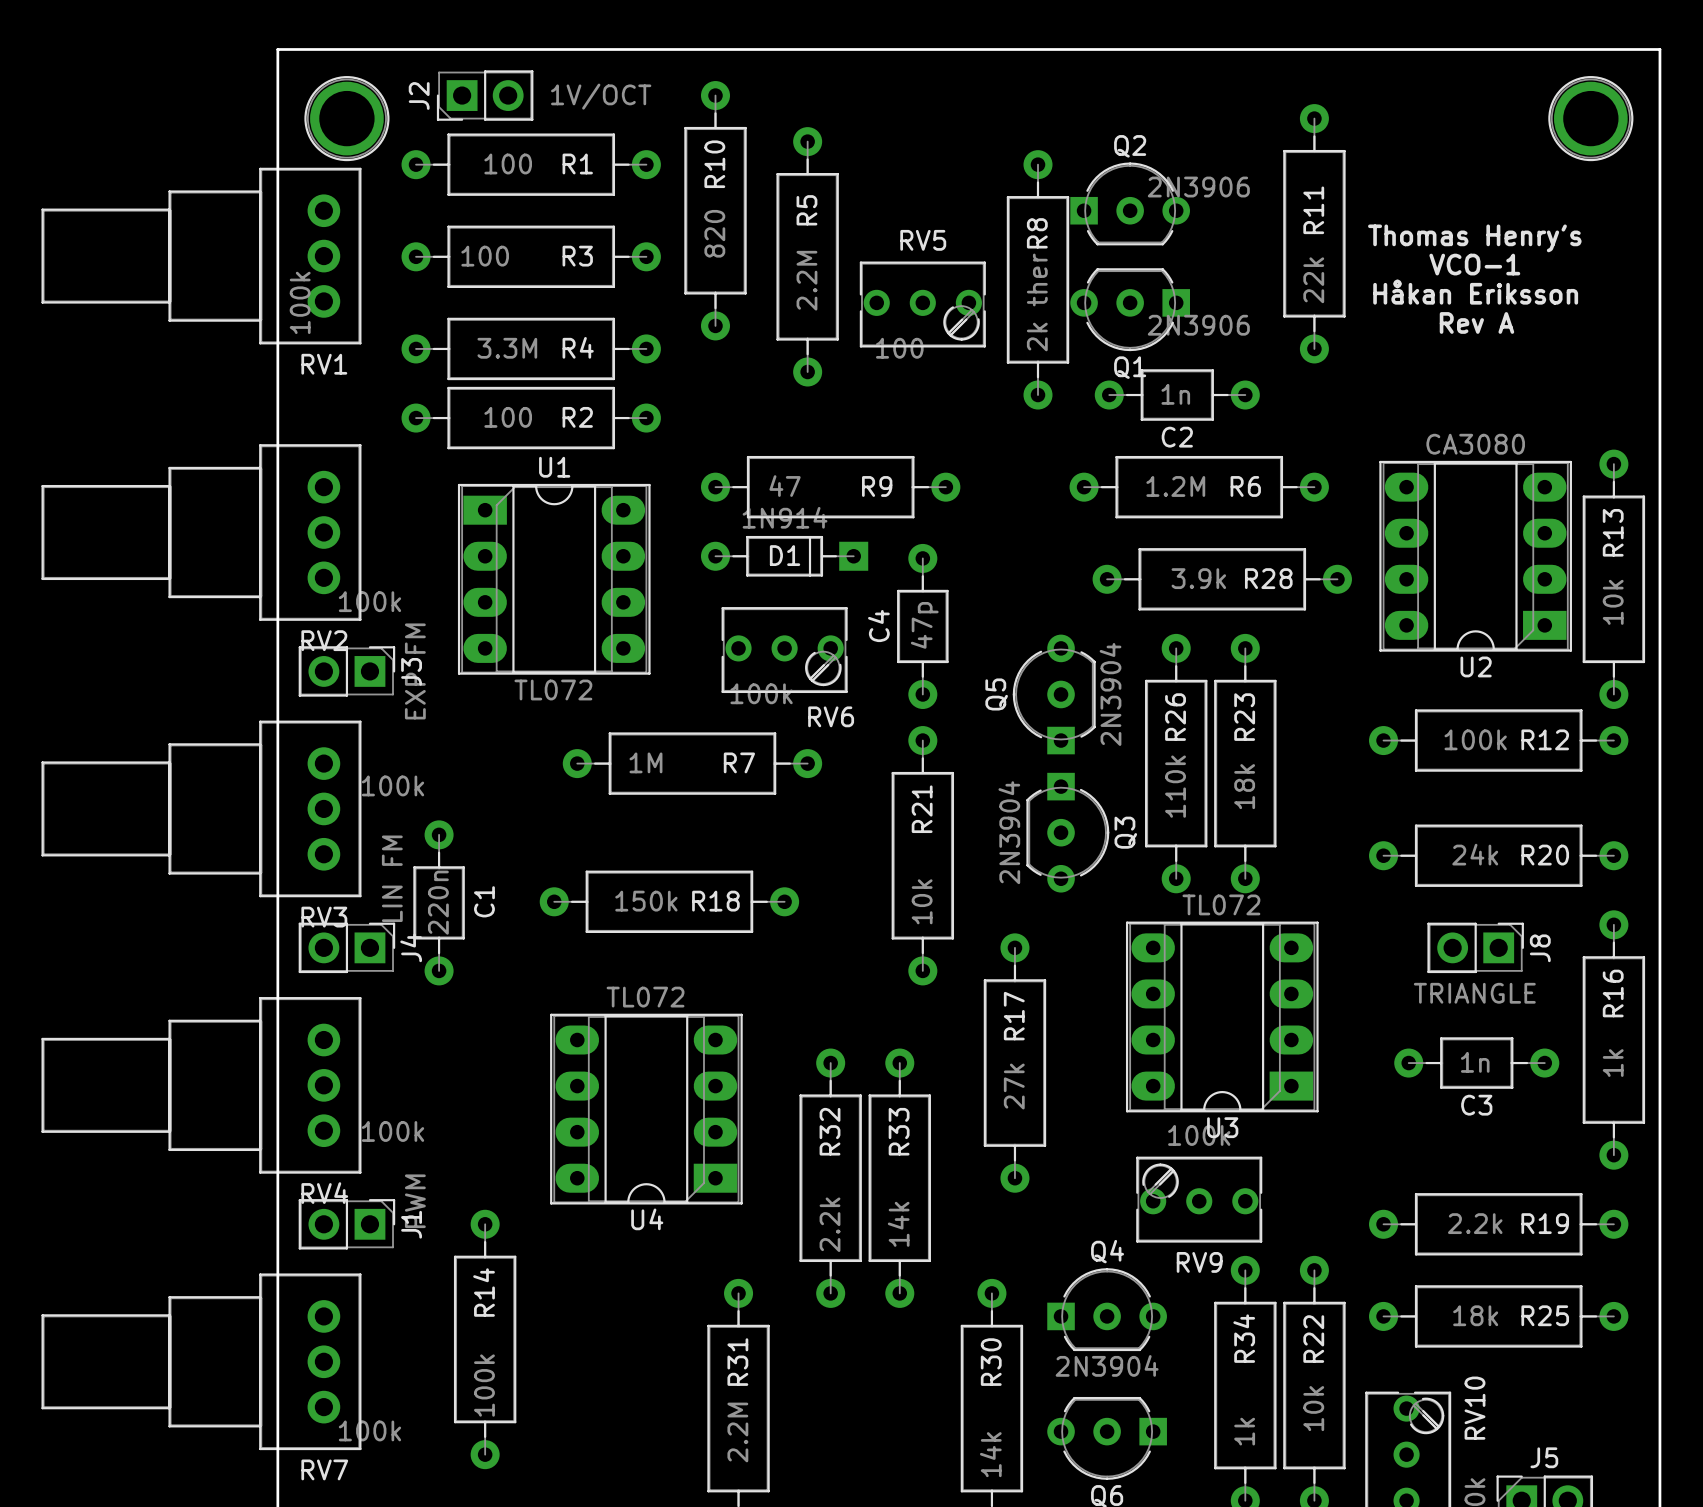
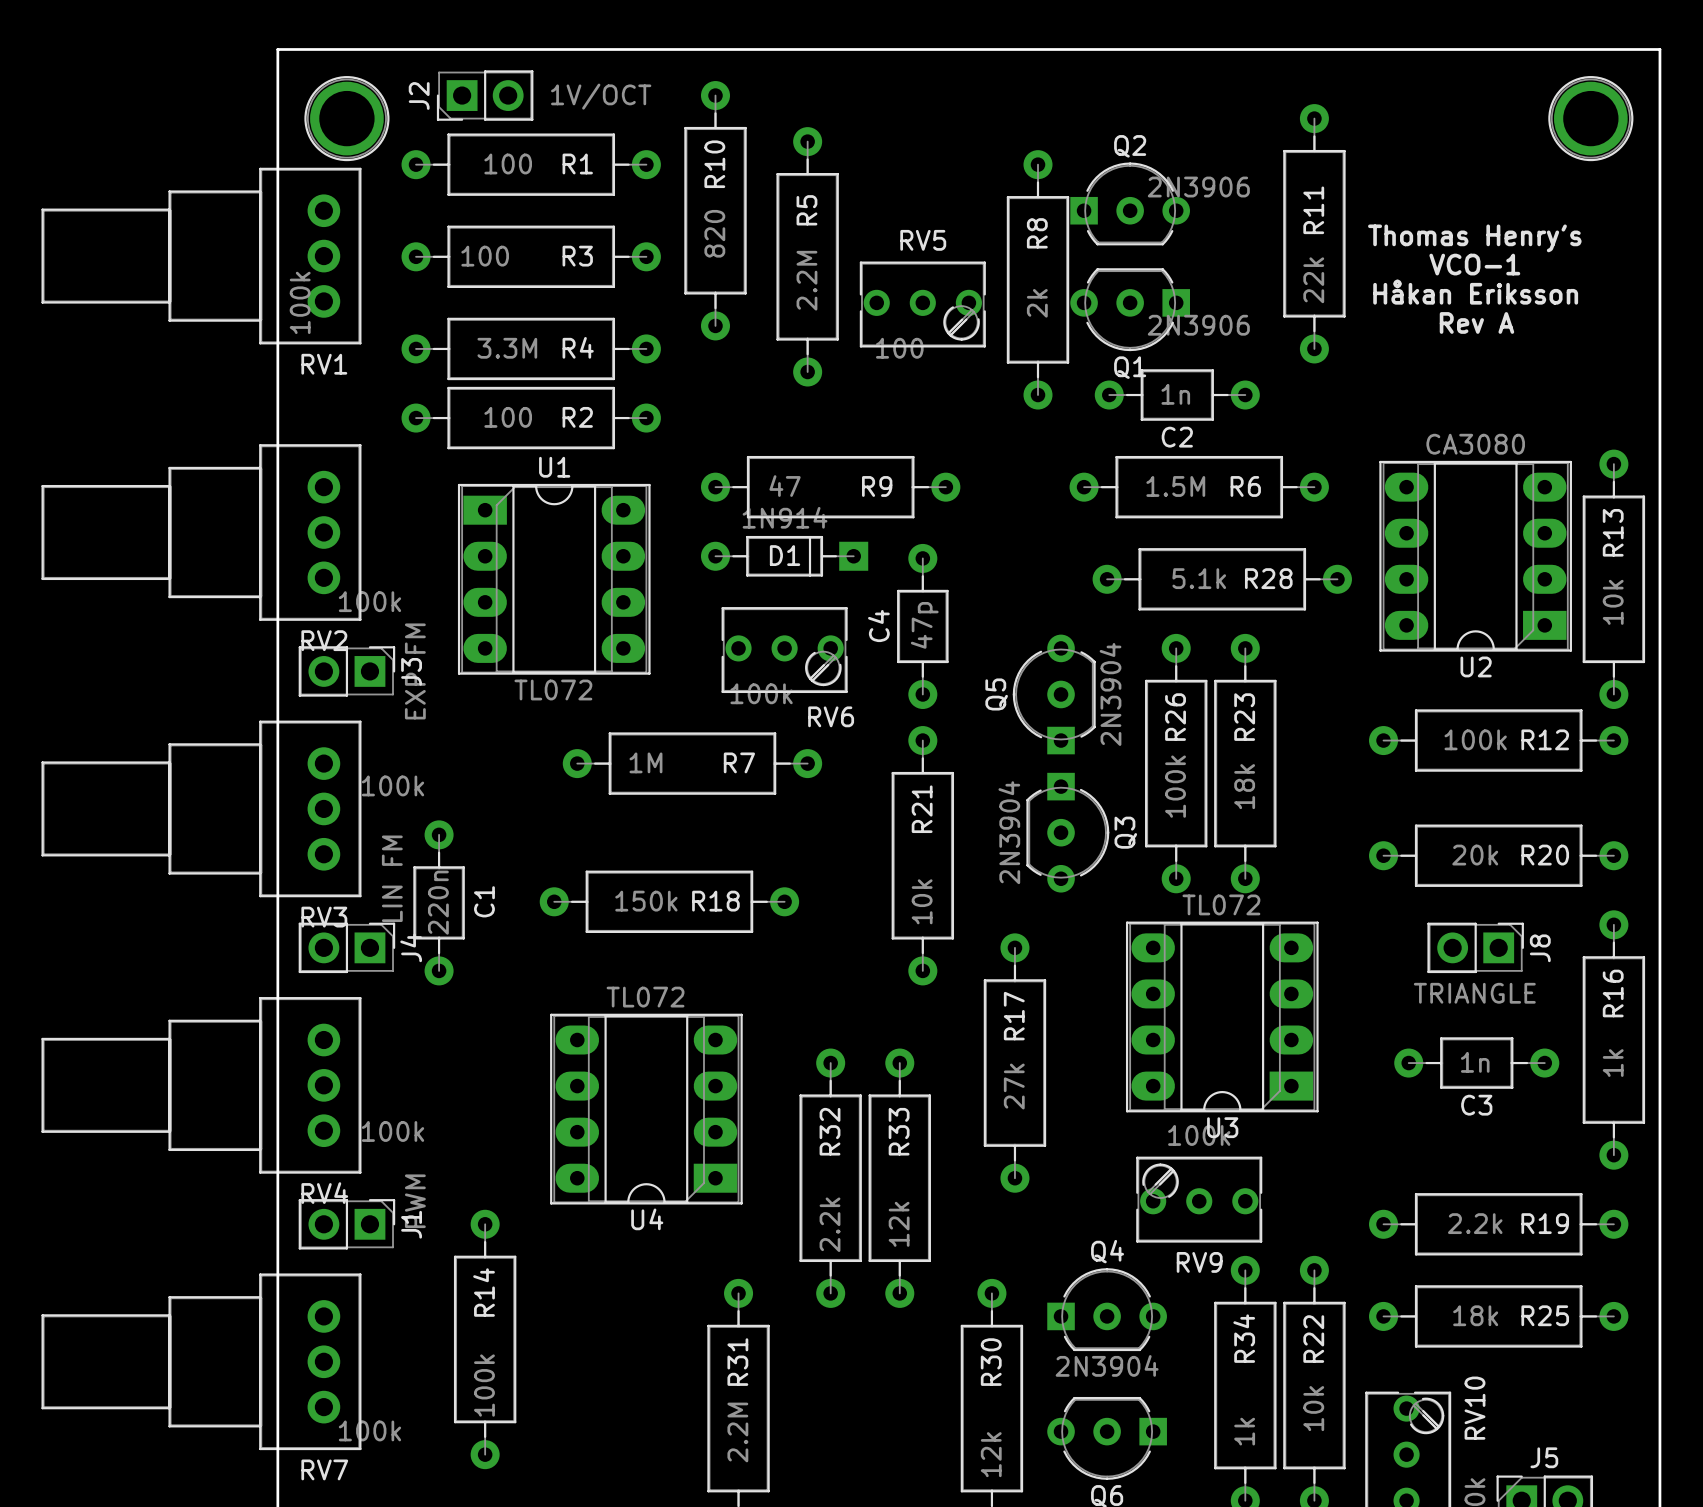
R8 value: 2k ther (1037, 302) -> 2k (1037, 303)
R6 value: 1.2M (1175, 486) -> 1.5M (1175, 486)
R28 value: 3.9k (1198, 578) -> 5.1k (1199, 578)
R26 value: 110k (1175, 786) -> 100k (1175, 786)
R20 value: 24k (1475, 854) -> 20k (1475, 855)
R33 value: 14k (898, 1224) -> 12k (899, 1224)
R30 value: 14k (990, 1454) -> 12k (991, 1454)

